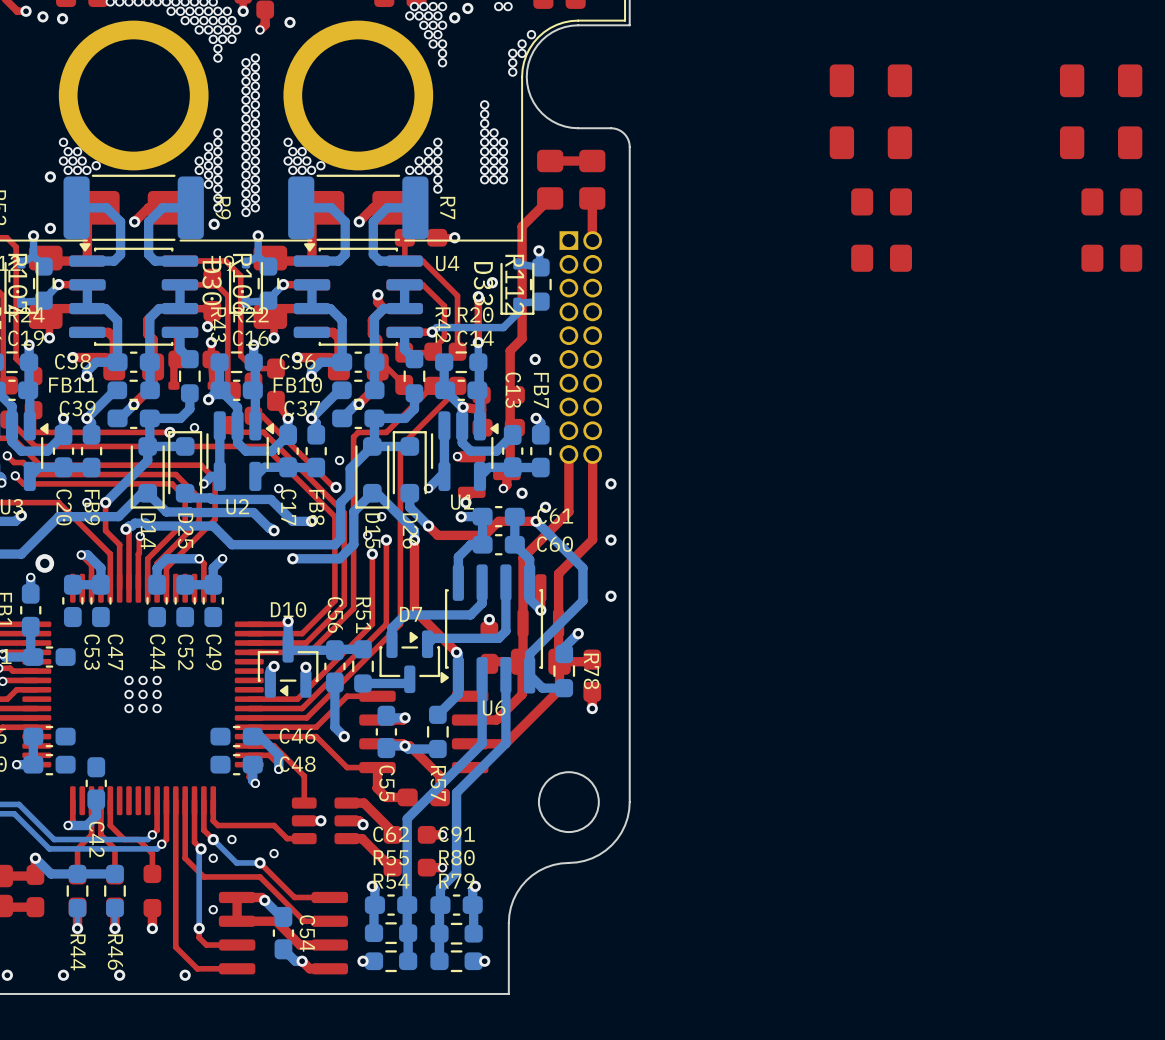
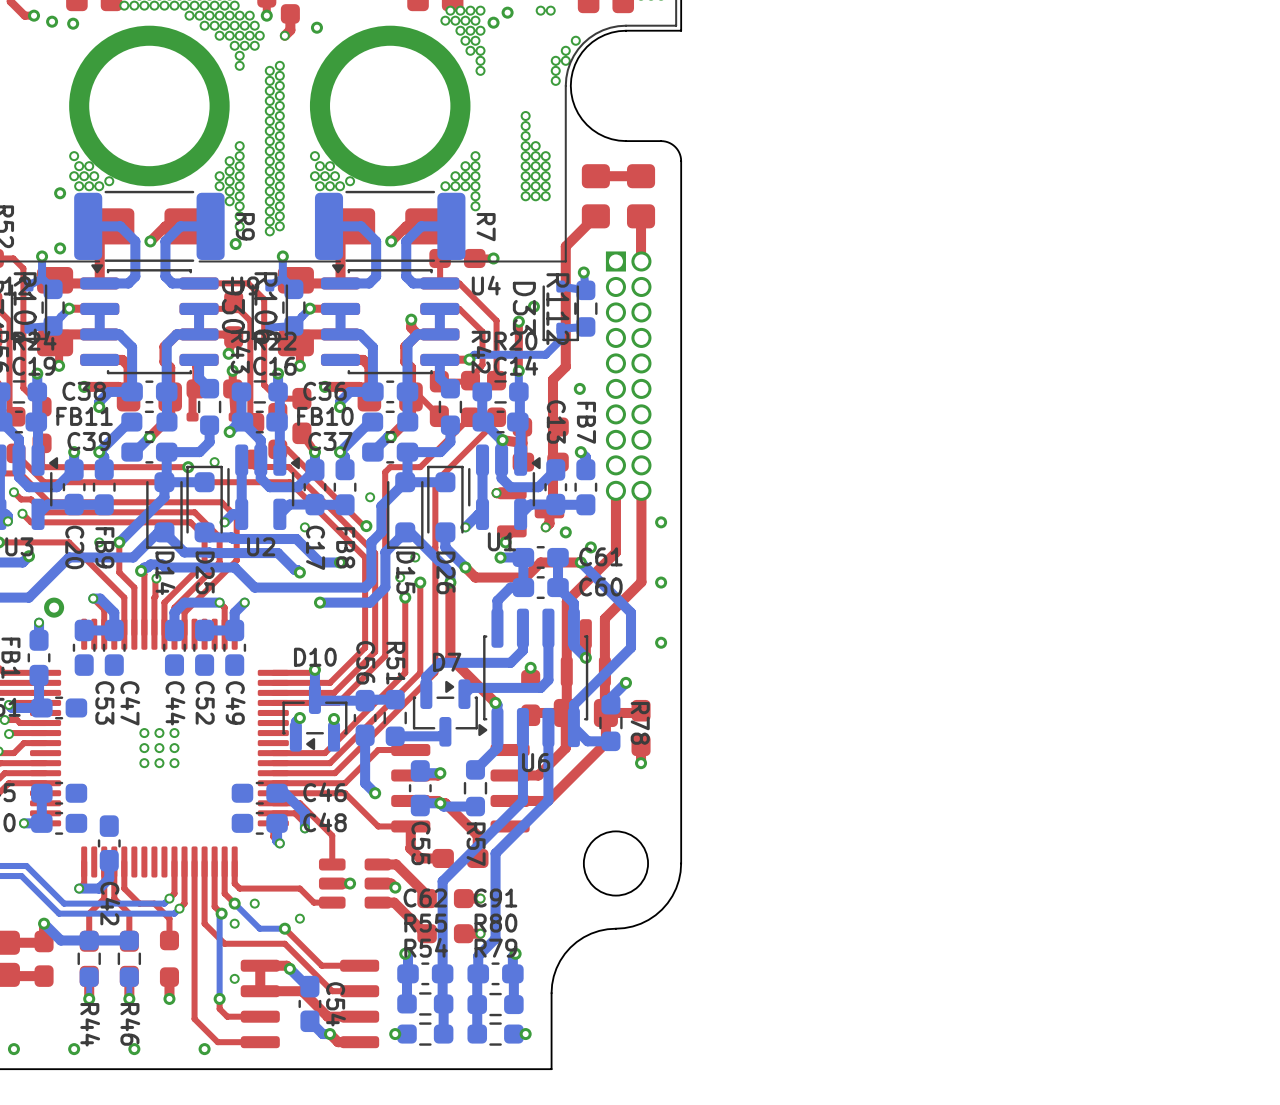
part: (870, 80) -> none
part: (1101, 80) -> none
part: (870, 142) -> none
part: (1101, 142) -> none
part: (881, 201) -> none
part: (1111, 201) -> none
part: (881, 258) -> none
part: (1111, 258) -> none

